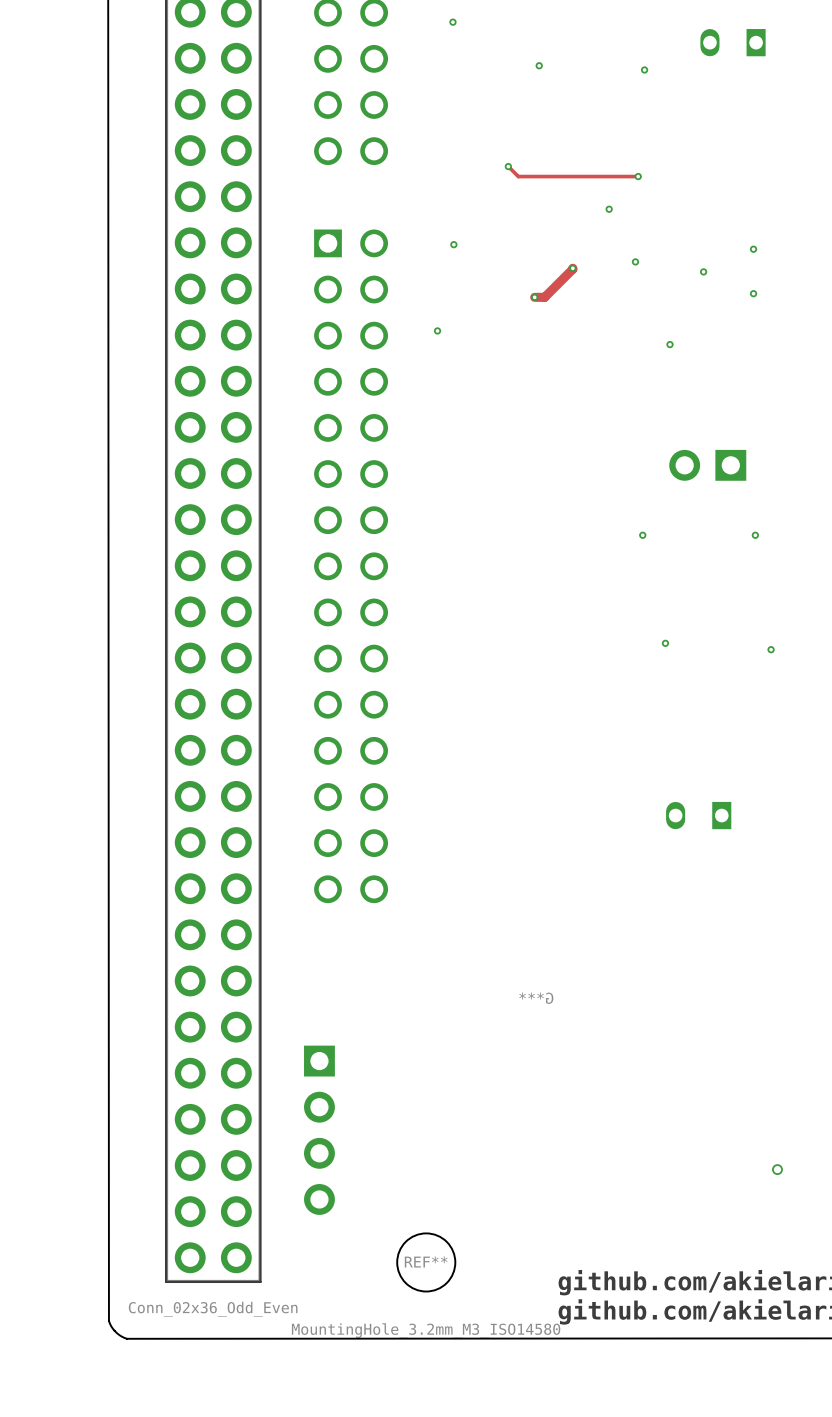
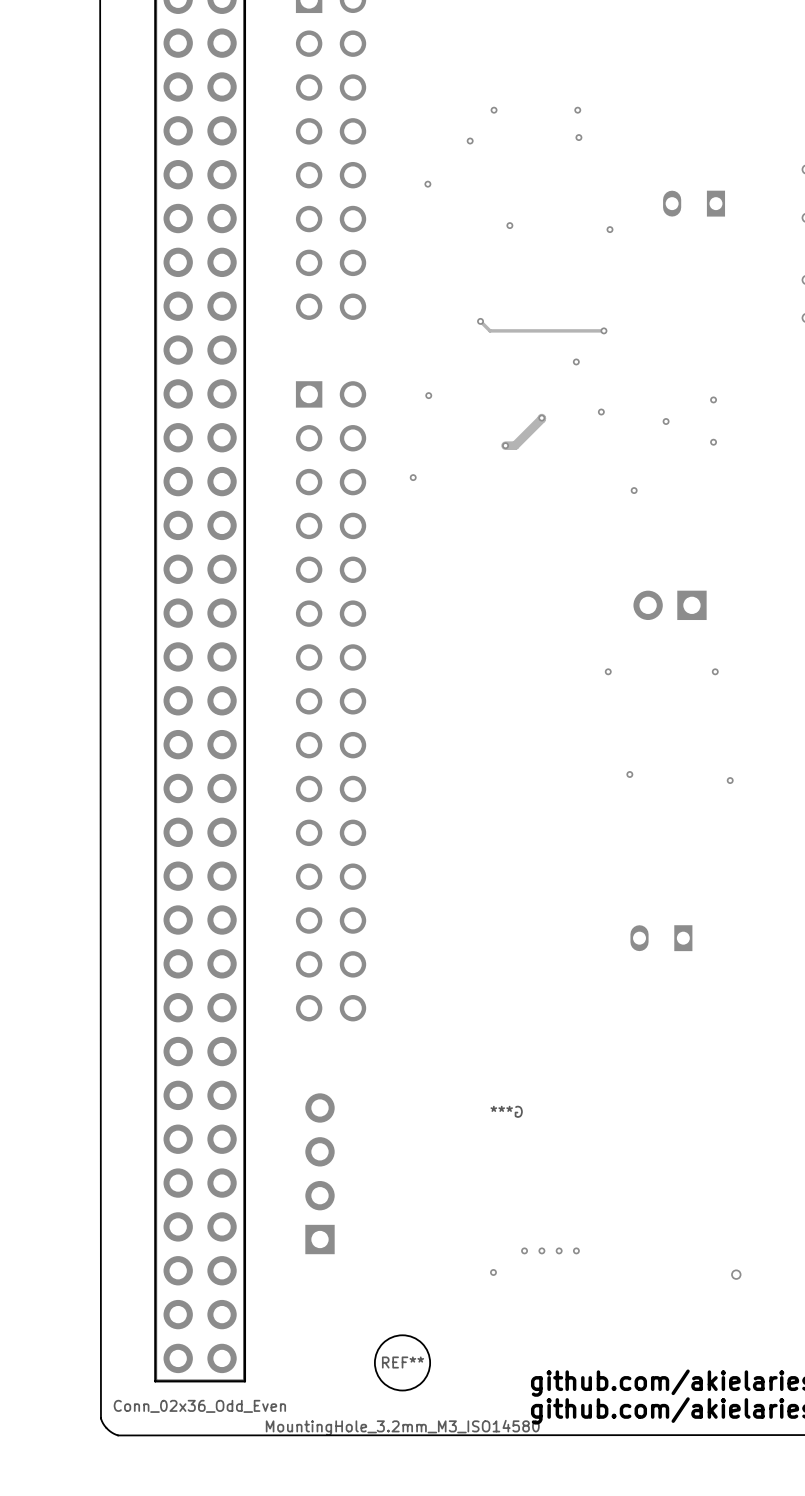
part rotation: 0° (319, 1130) -> 180° (320, 1173)
via: none -> (524, 1250)
via: none -> (541, 1250)
via: none -> (559, 1250)
via: none -> (576, 1250)
via: none -> (493, 1272)

